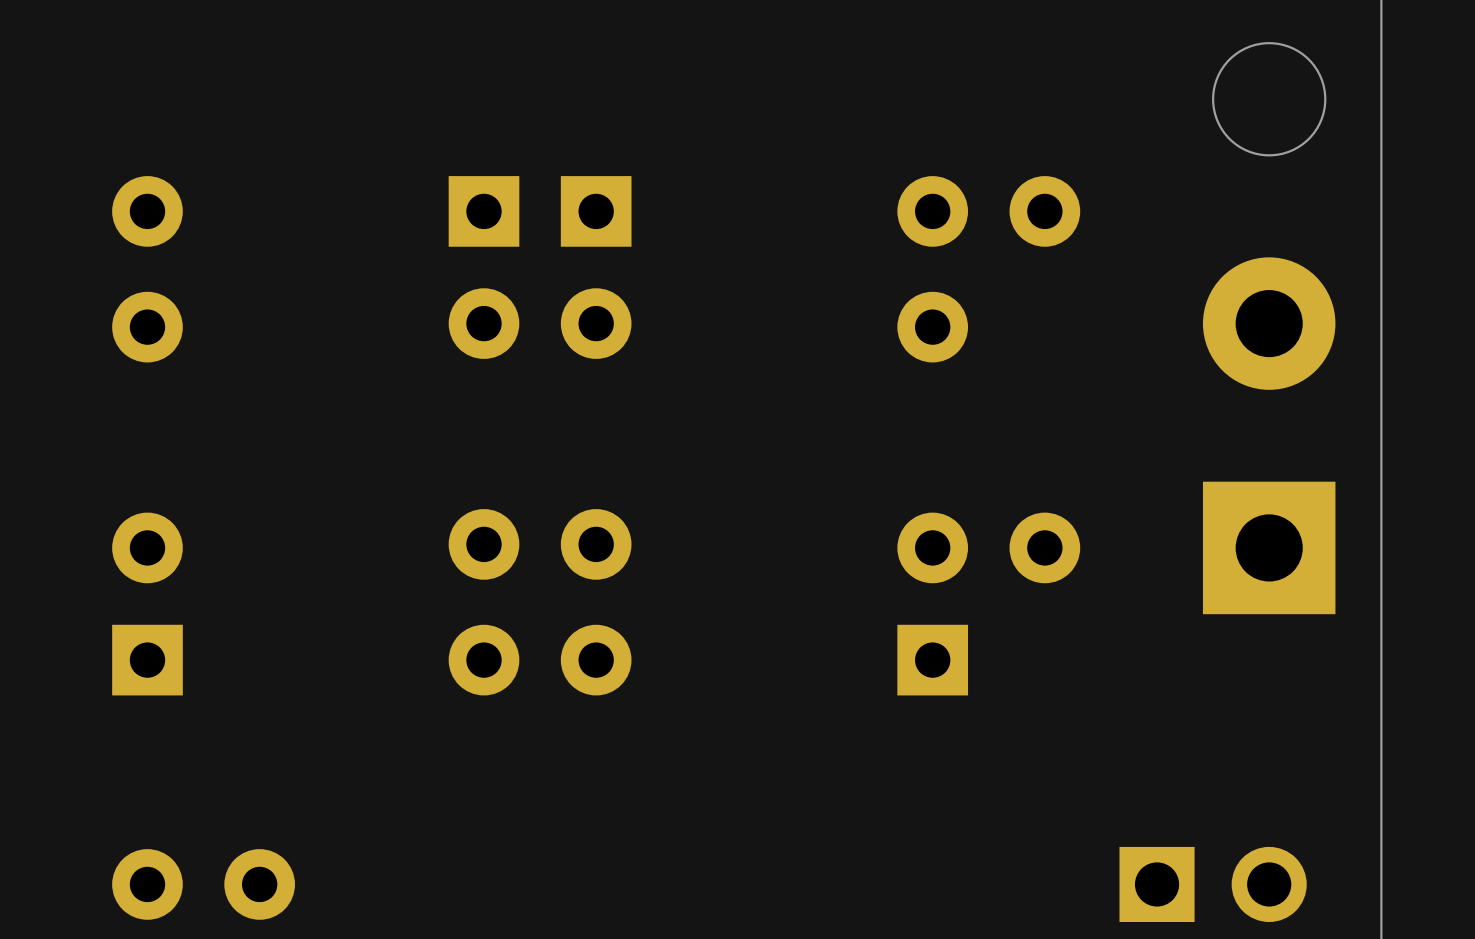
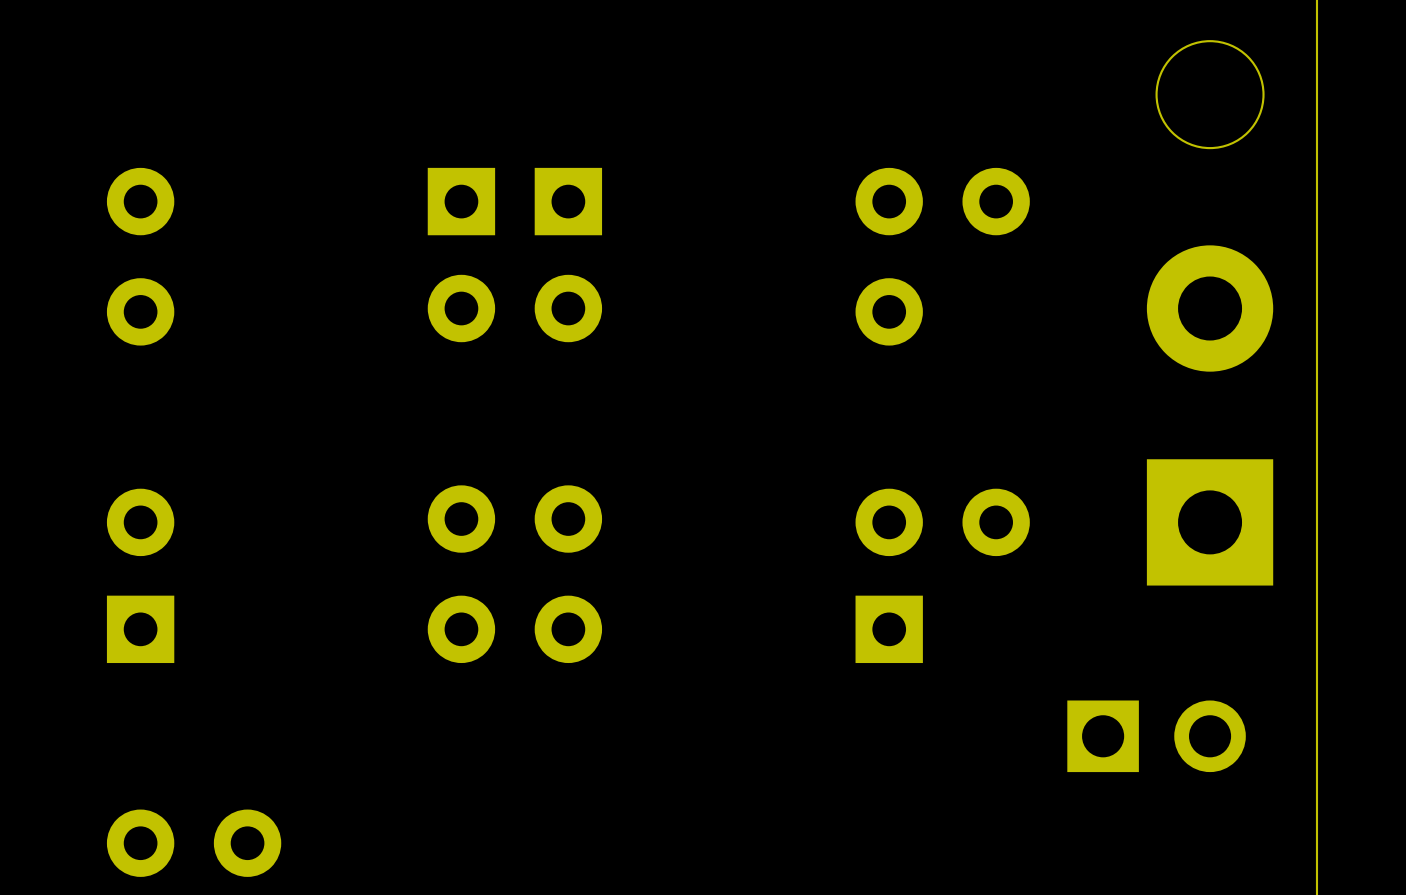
part position: (1213, 884) -> (1156, 736)

